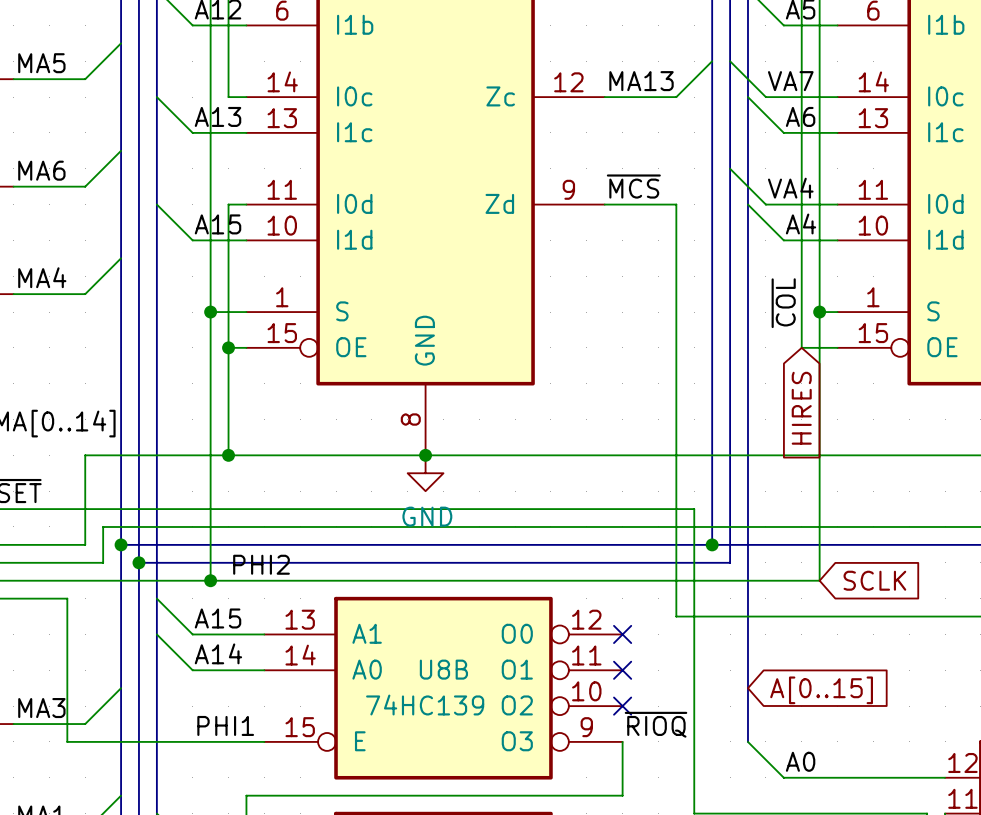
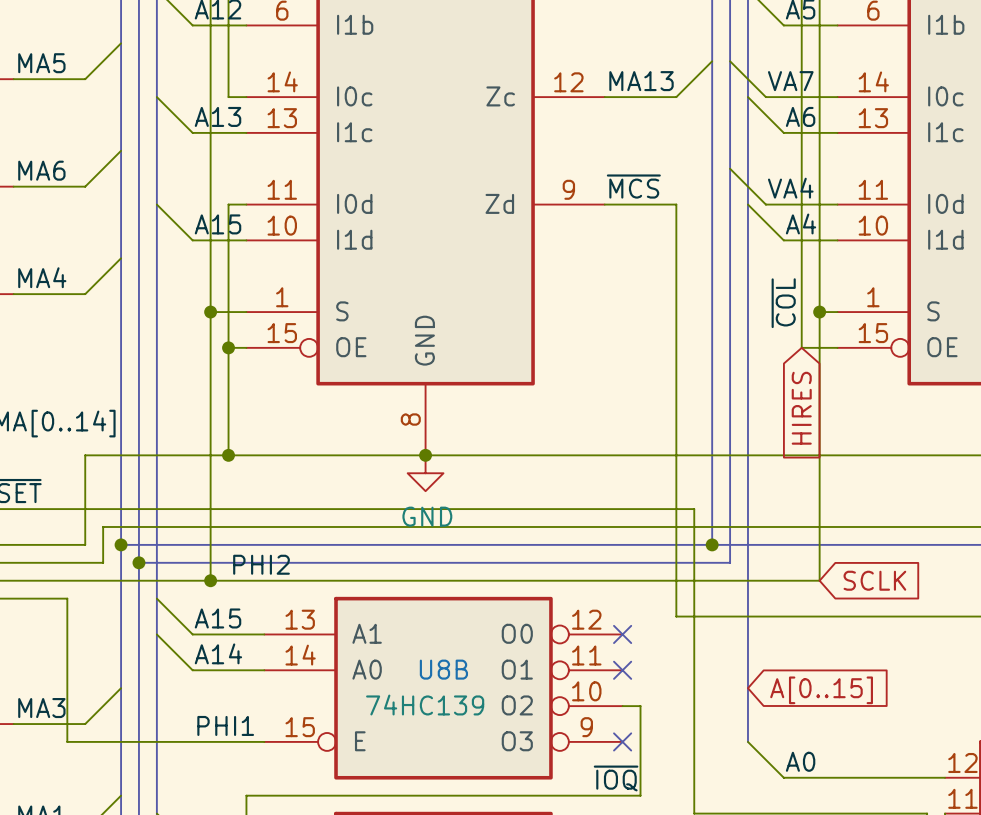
no-connect mark position: (622, 706) -> (622, 741)
label: ~{RIOQ} (656, 724) -> none
wire: (622, 741) (622, 795) -> (622, 706) (640, 706) (640, 795) (622, 795)
label: none -> ~{IOQ} (616, 778)

